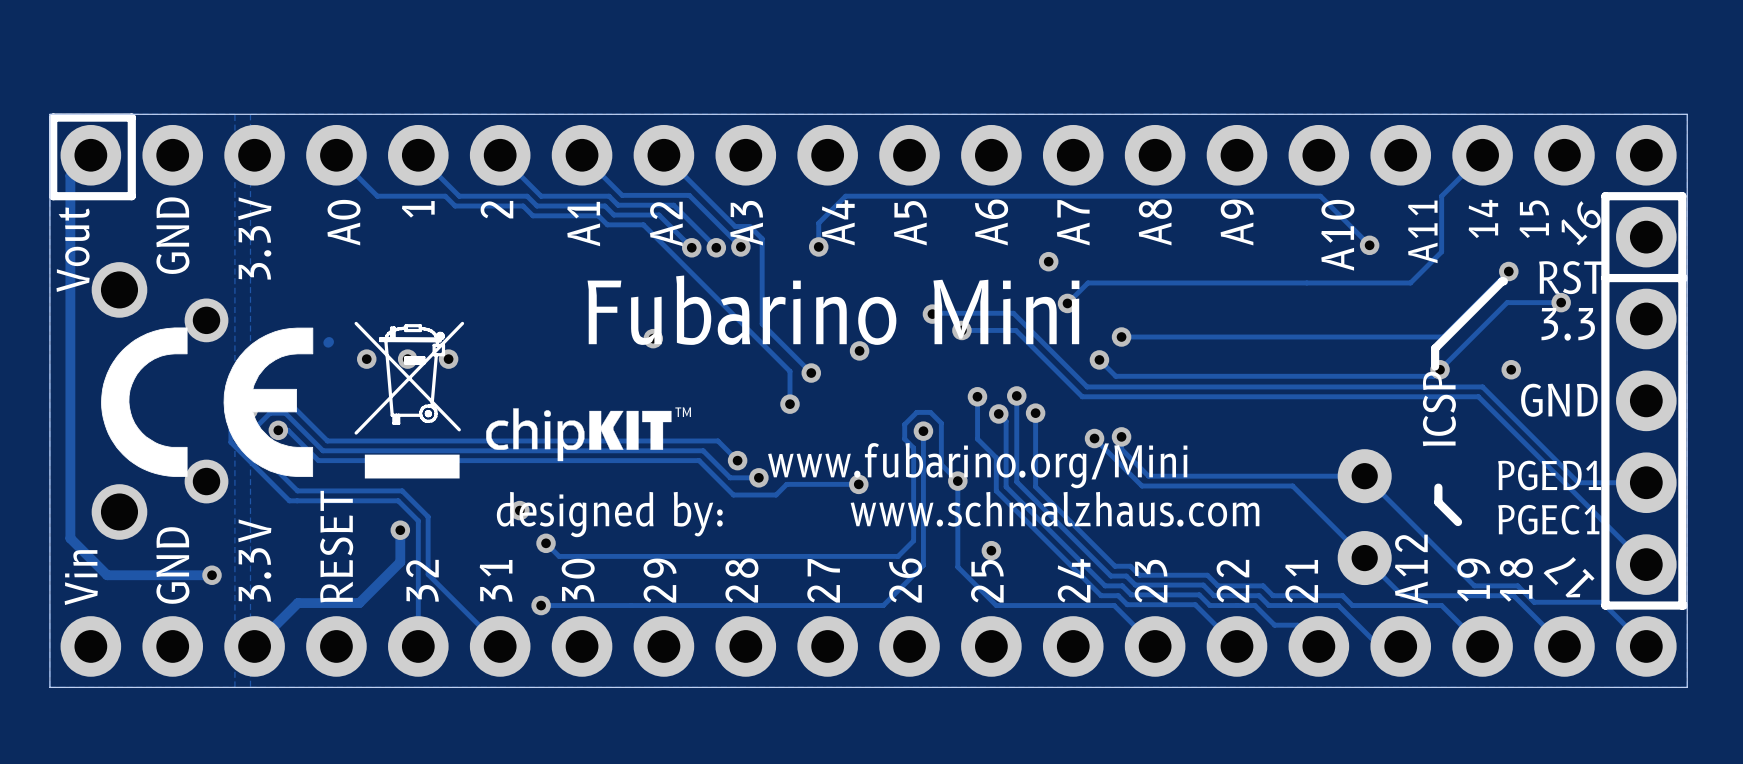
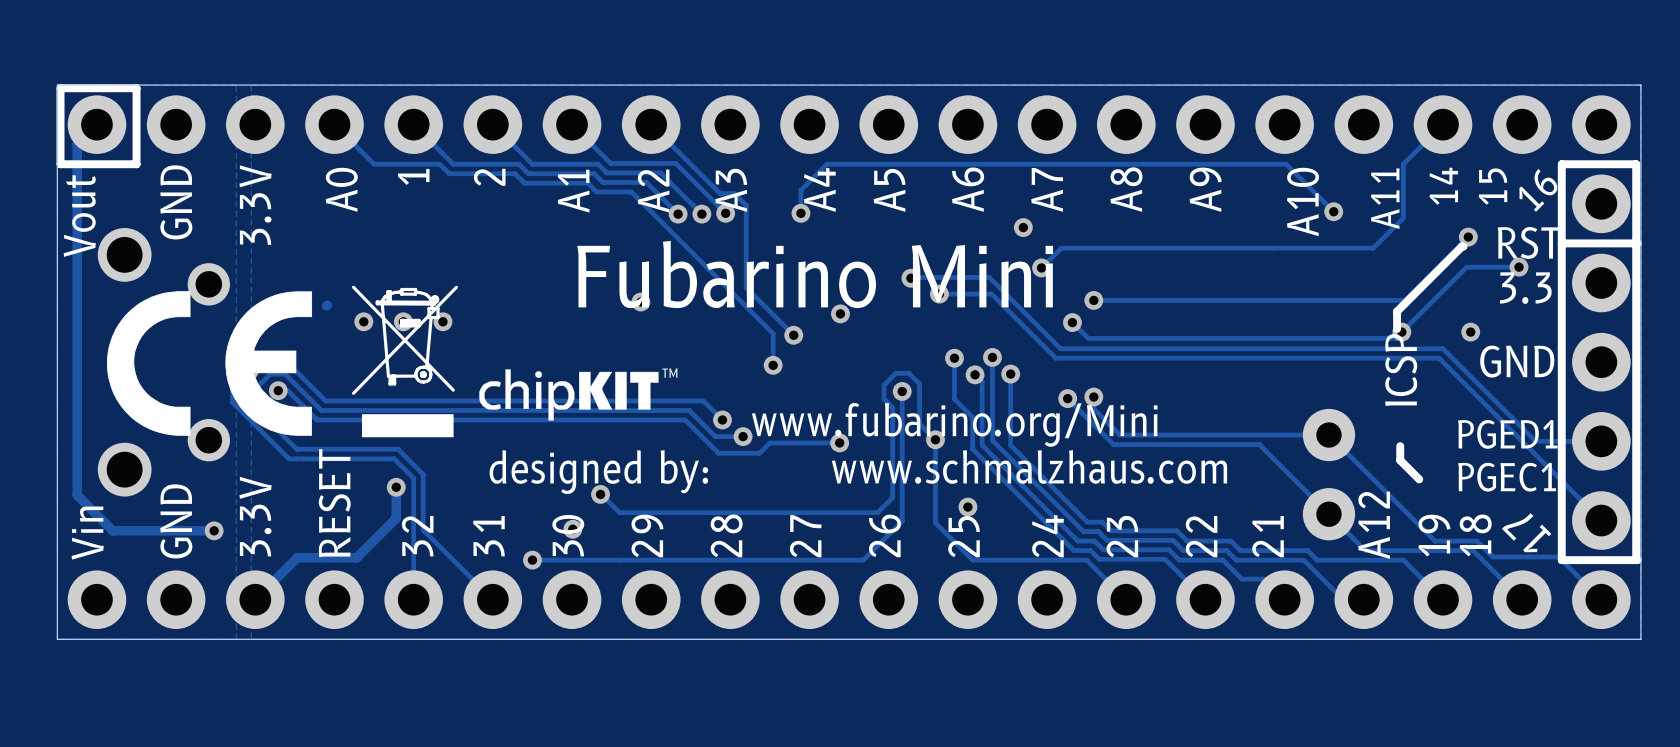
via: (519, 510) -> none
via: none -> (600, 494)
track: (546, 543) (559, 556) (631, 556) -> (600, 494) (619, 512)
via: (546, 543) -> none
via: none -> (572, 529)

